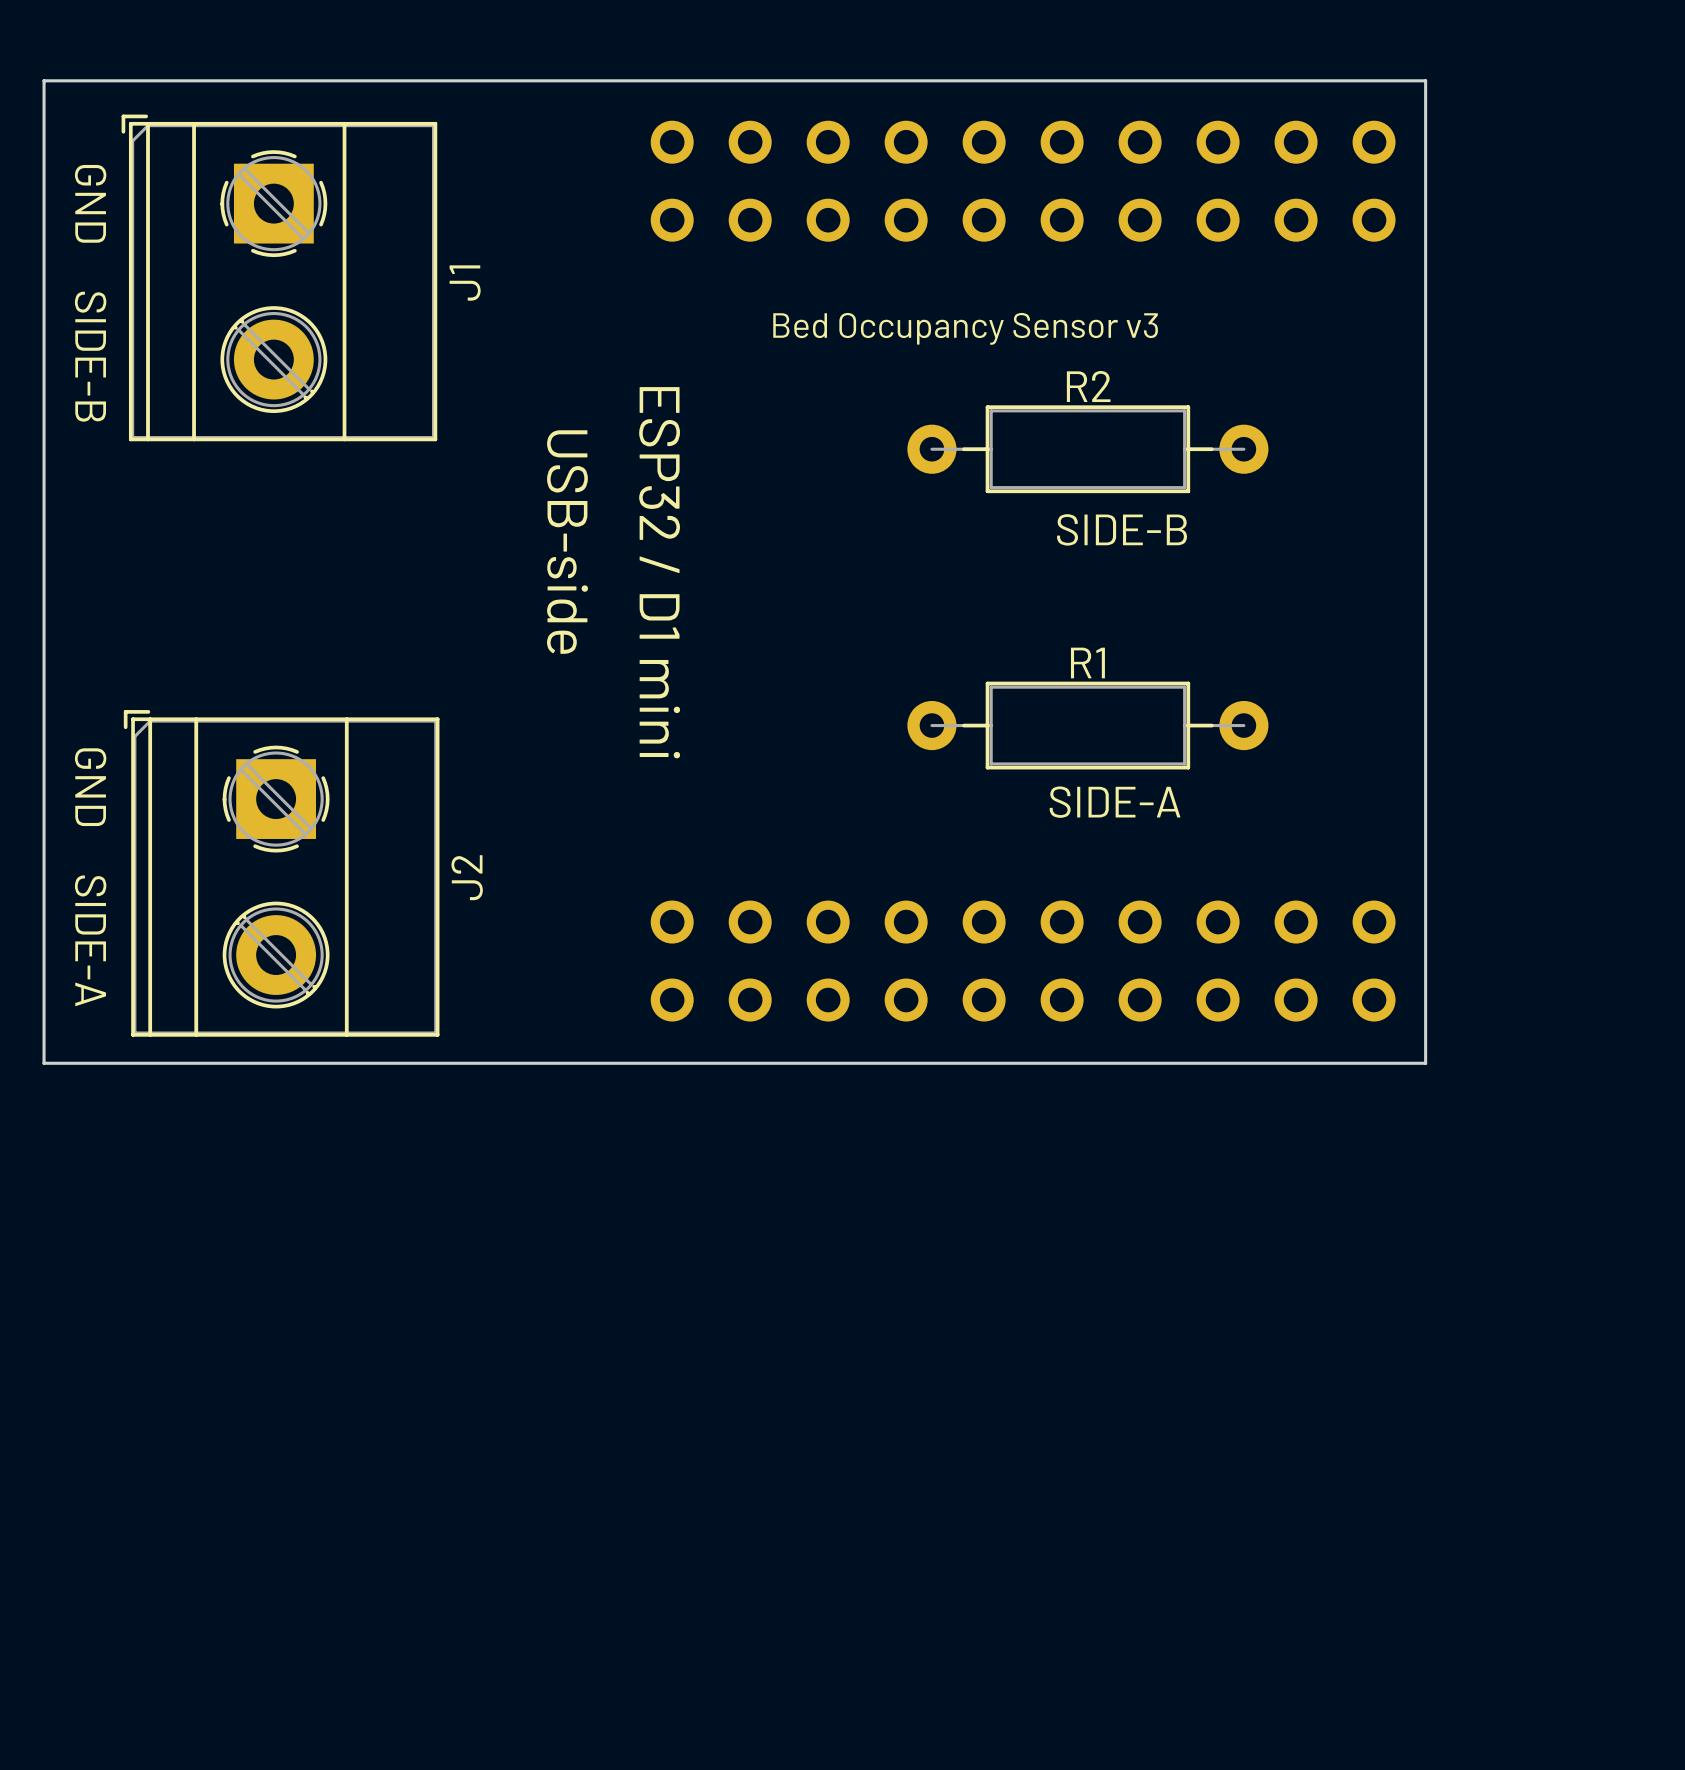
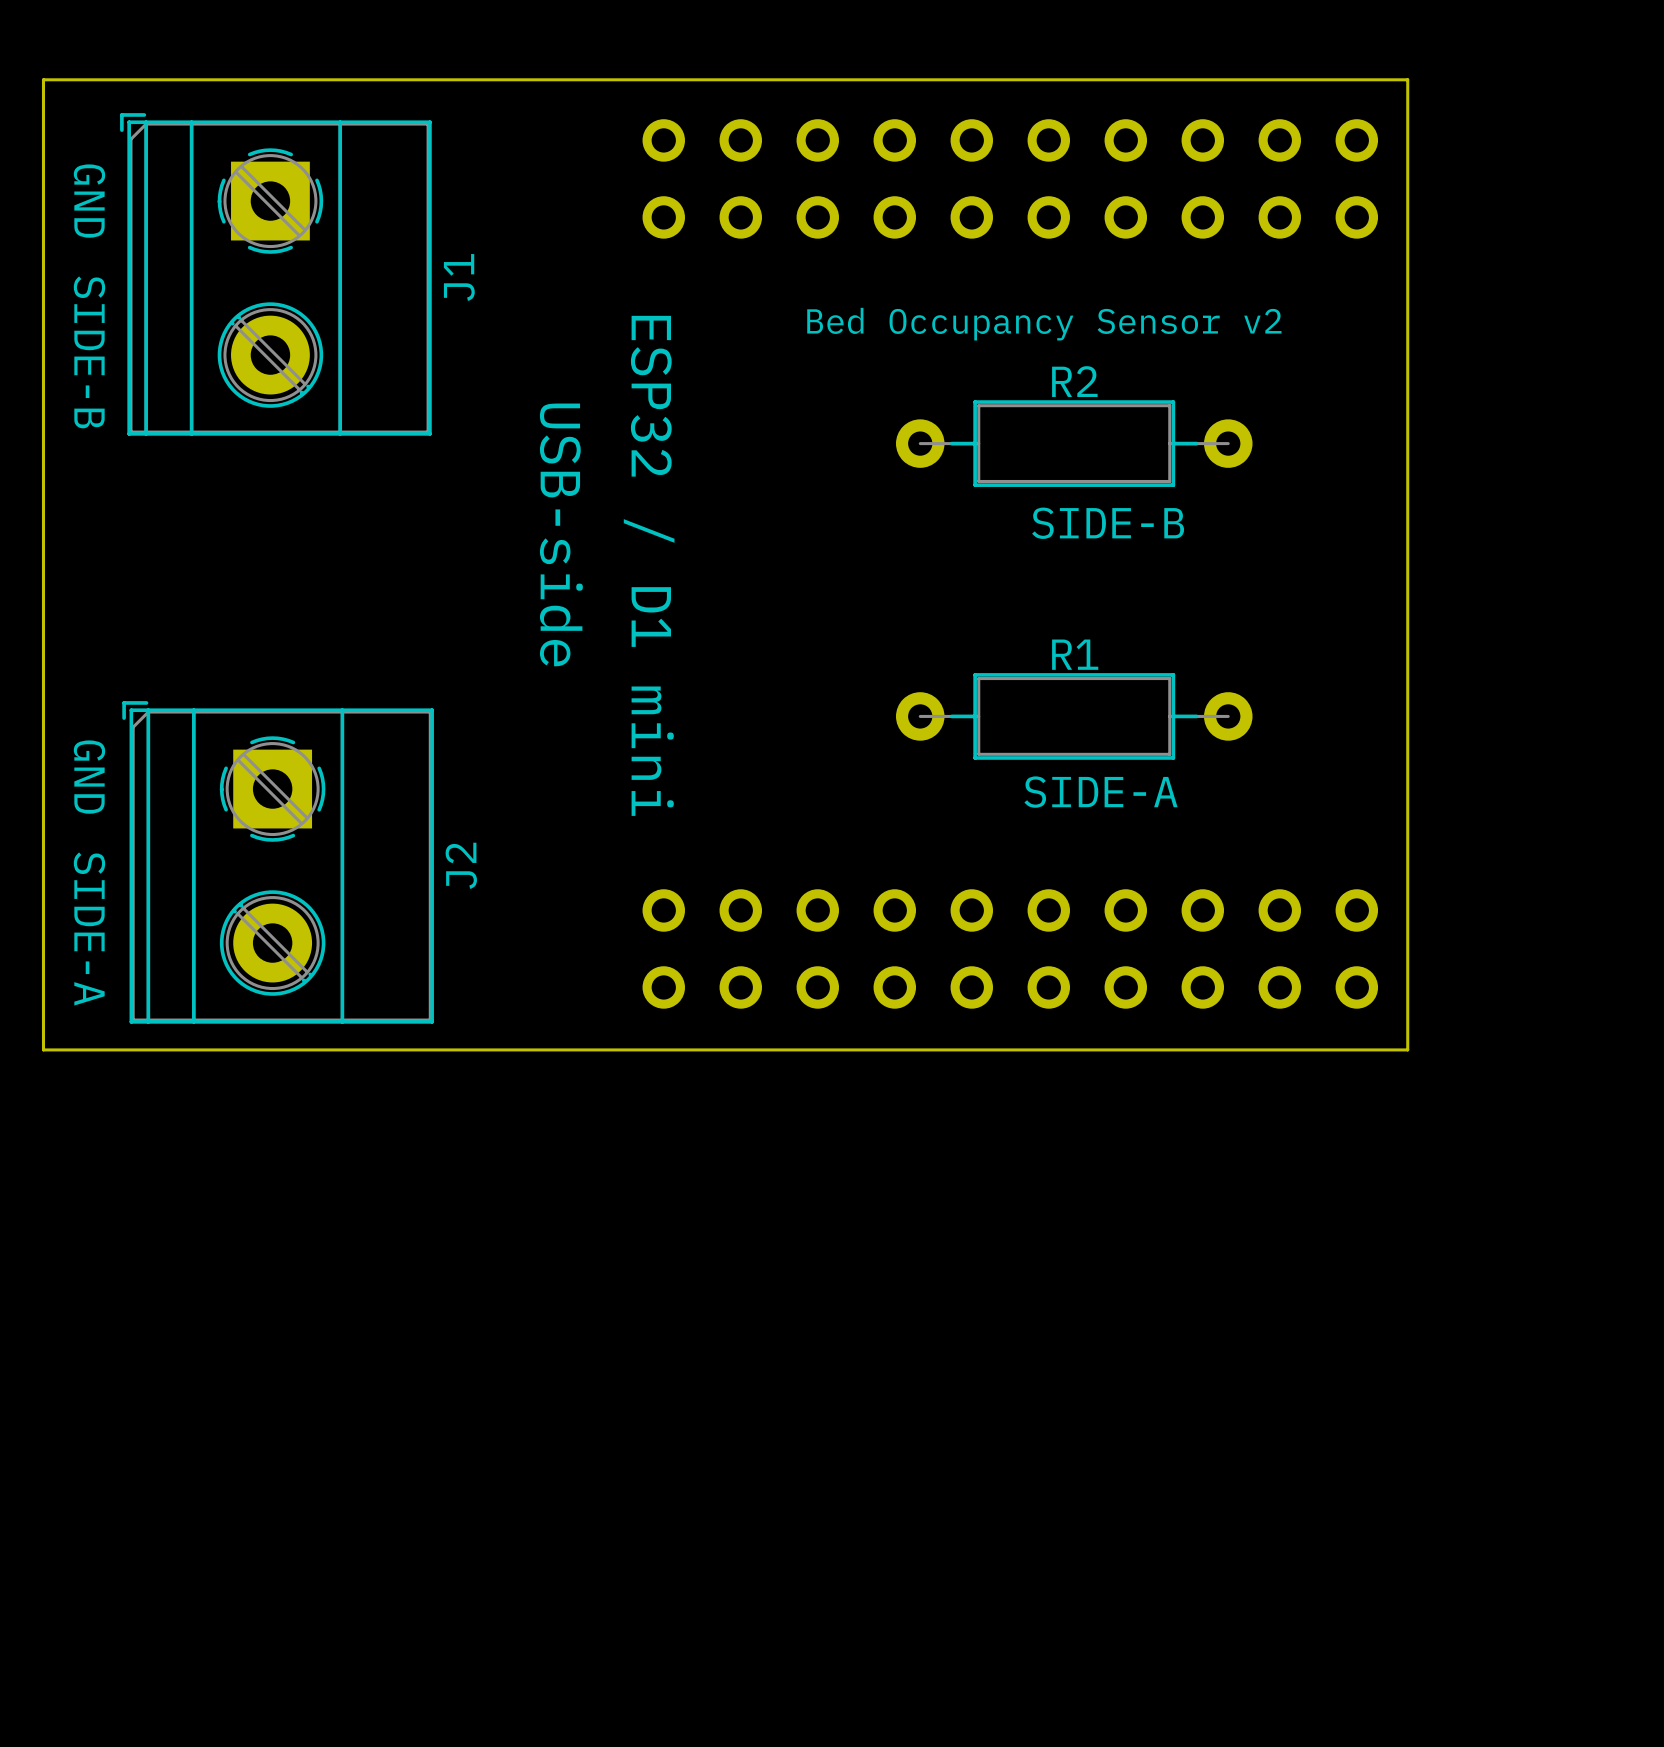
text: Bed Occupancy Sensor v3 (965, 328) -> Bed Occupancy Sensor v2 (1044, 324)

